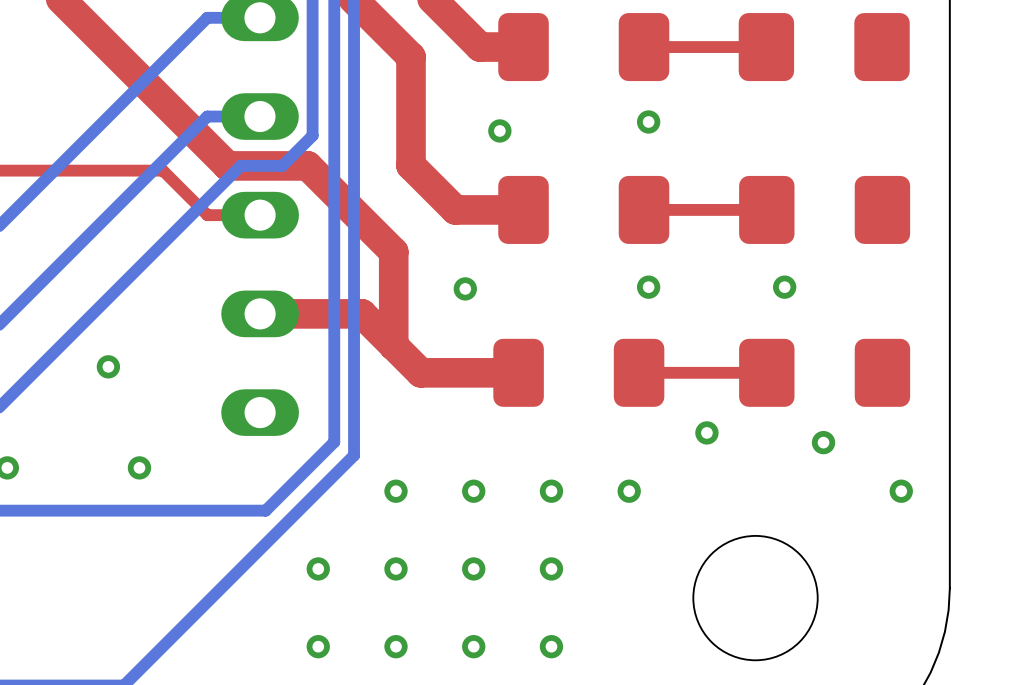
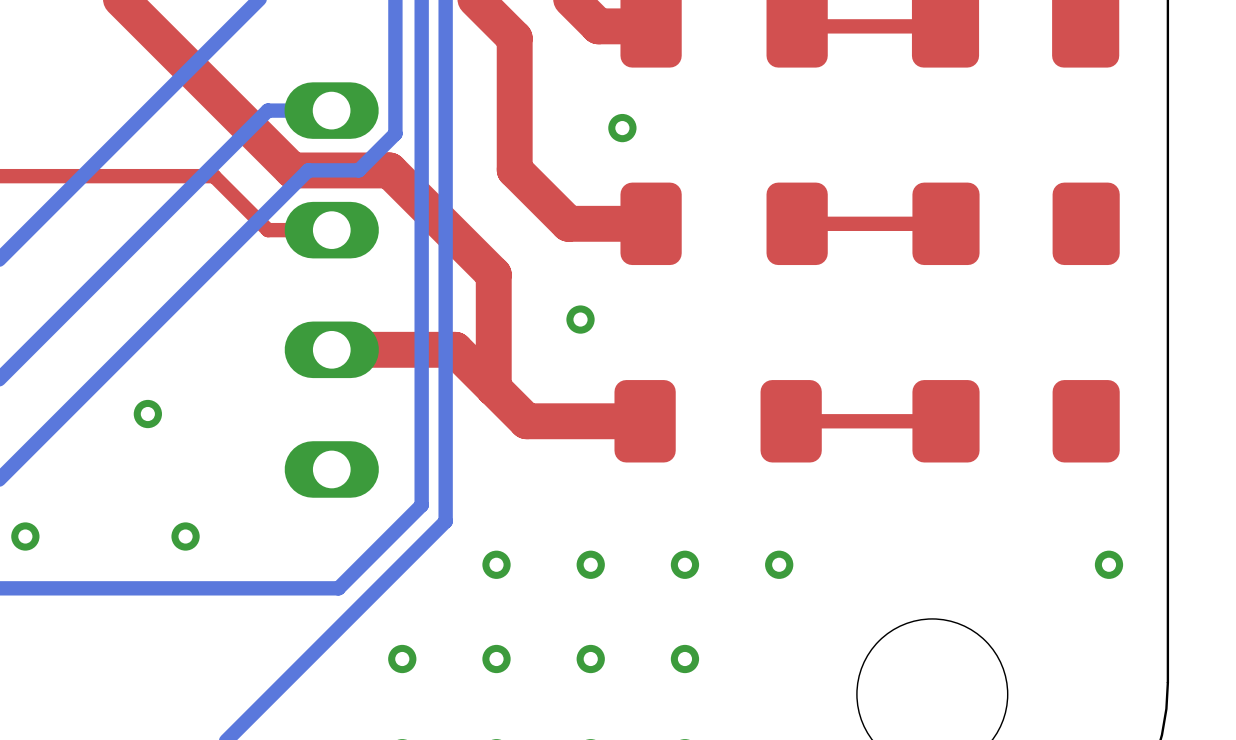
via: (648, 121) -> none
via: (648, 287) -> none
via: (784, 287) -> none
via: (706, 432) -> none
via: (823, 442) -> none

